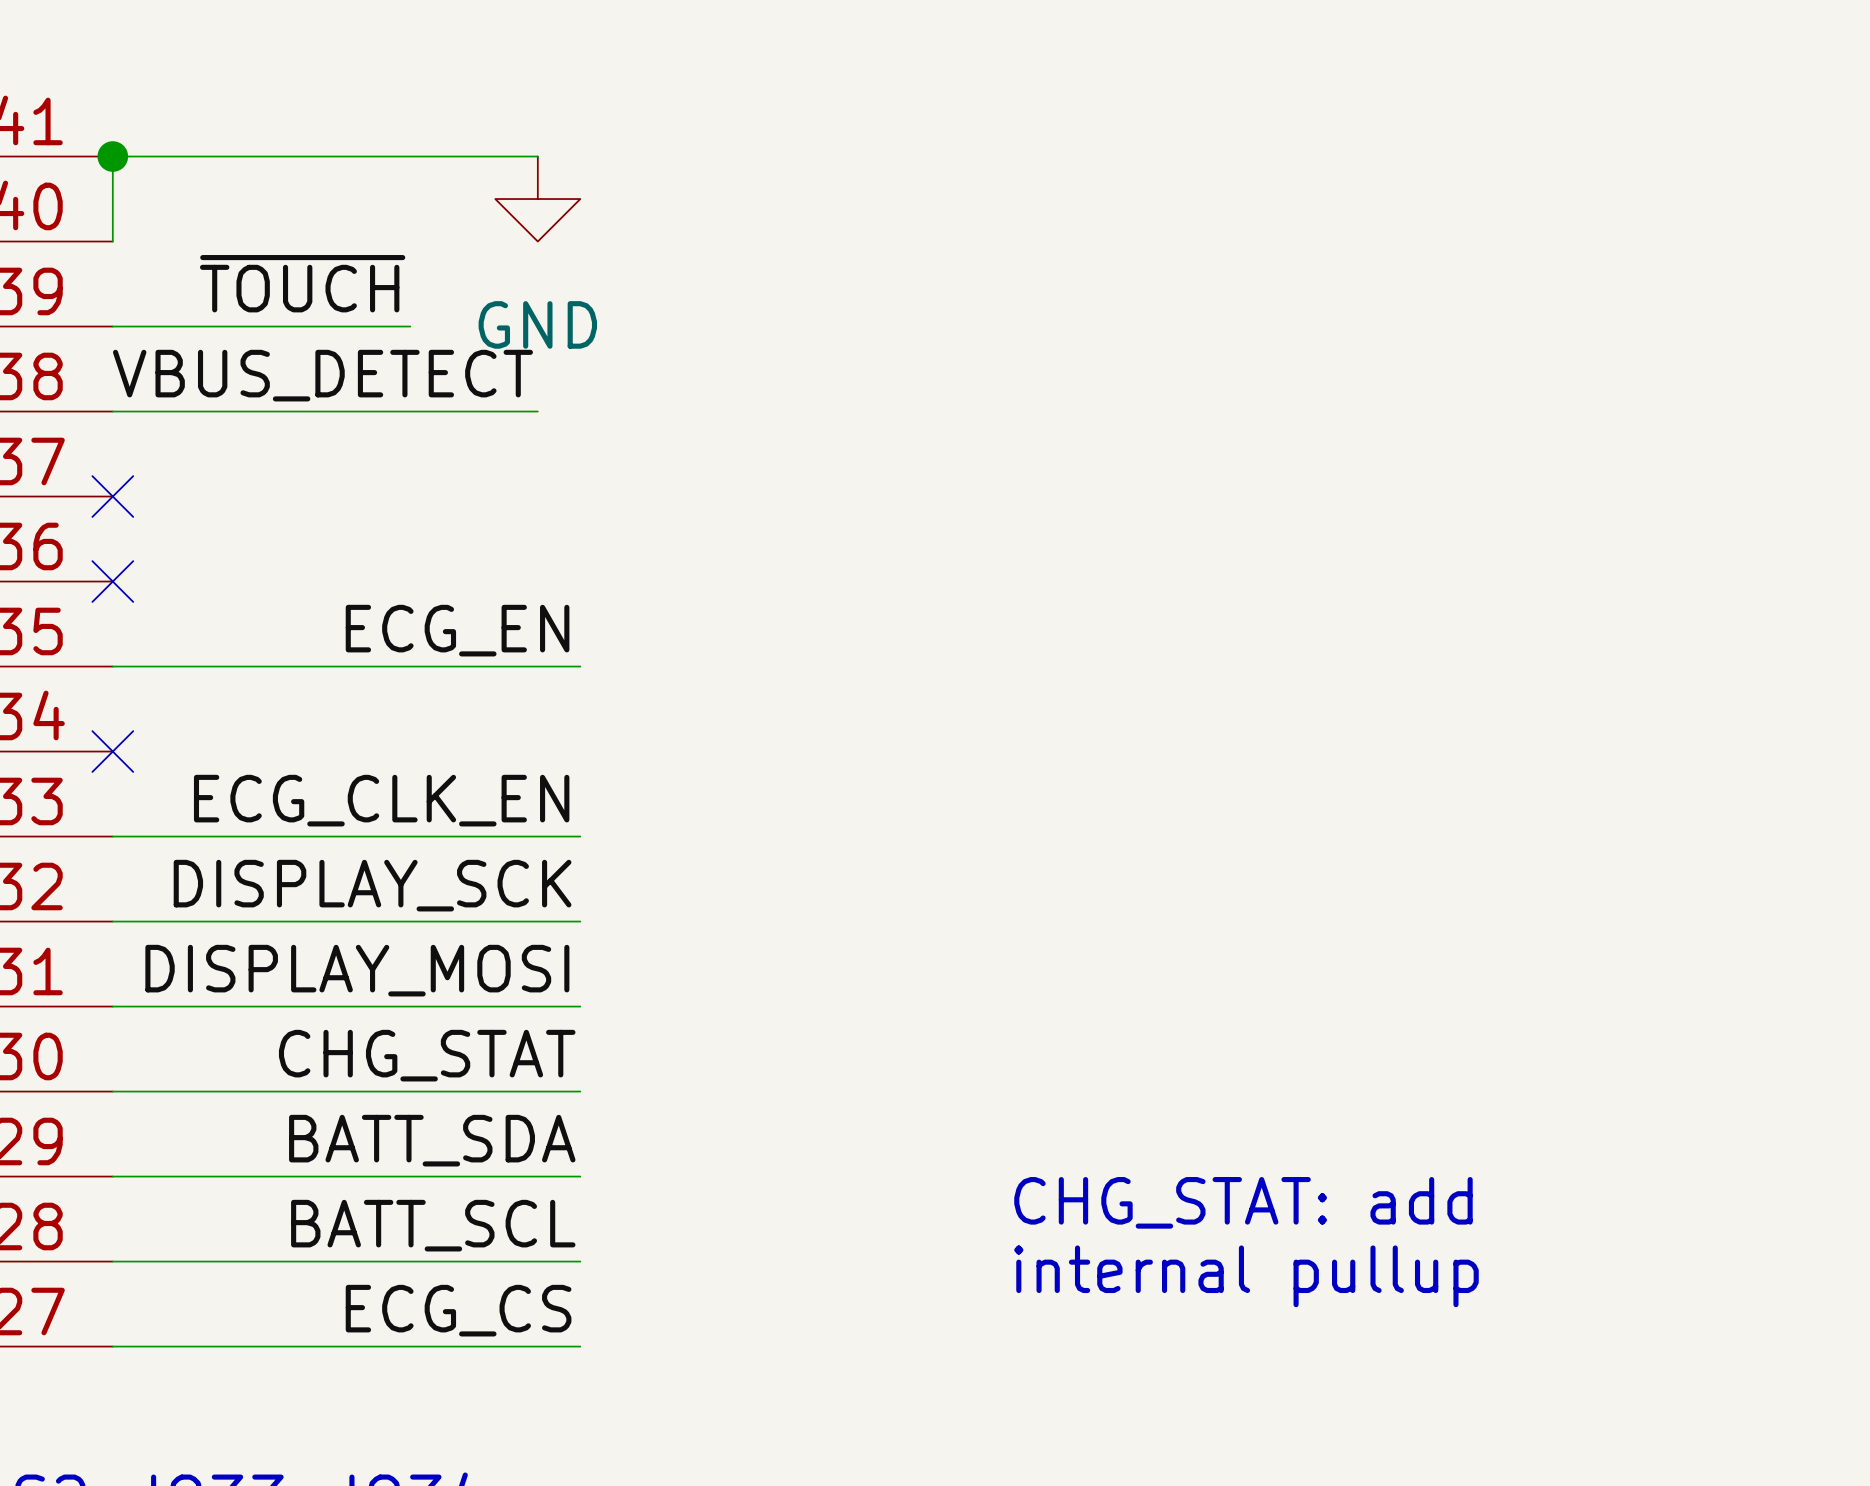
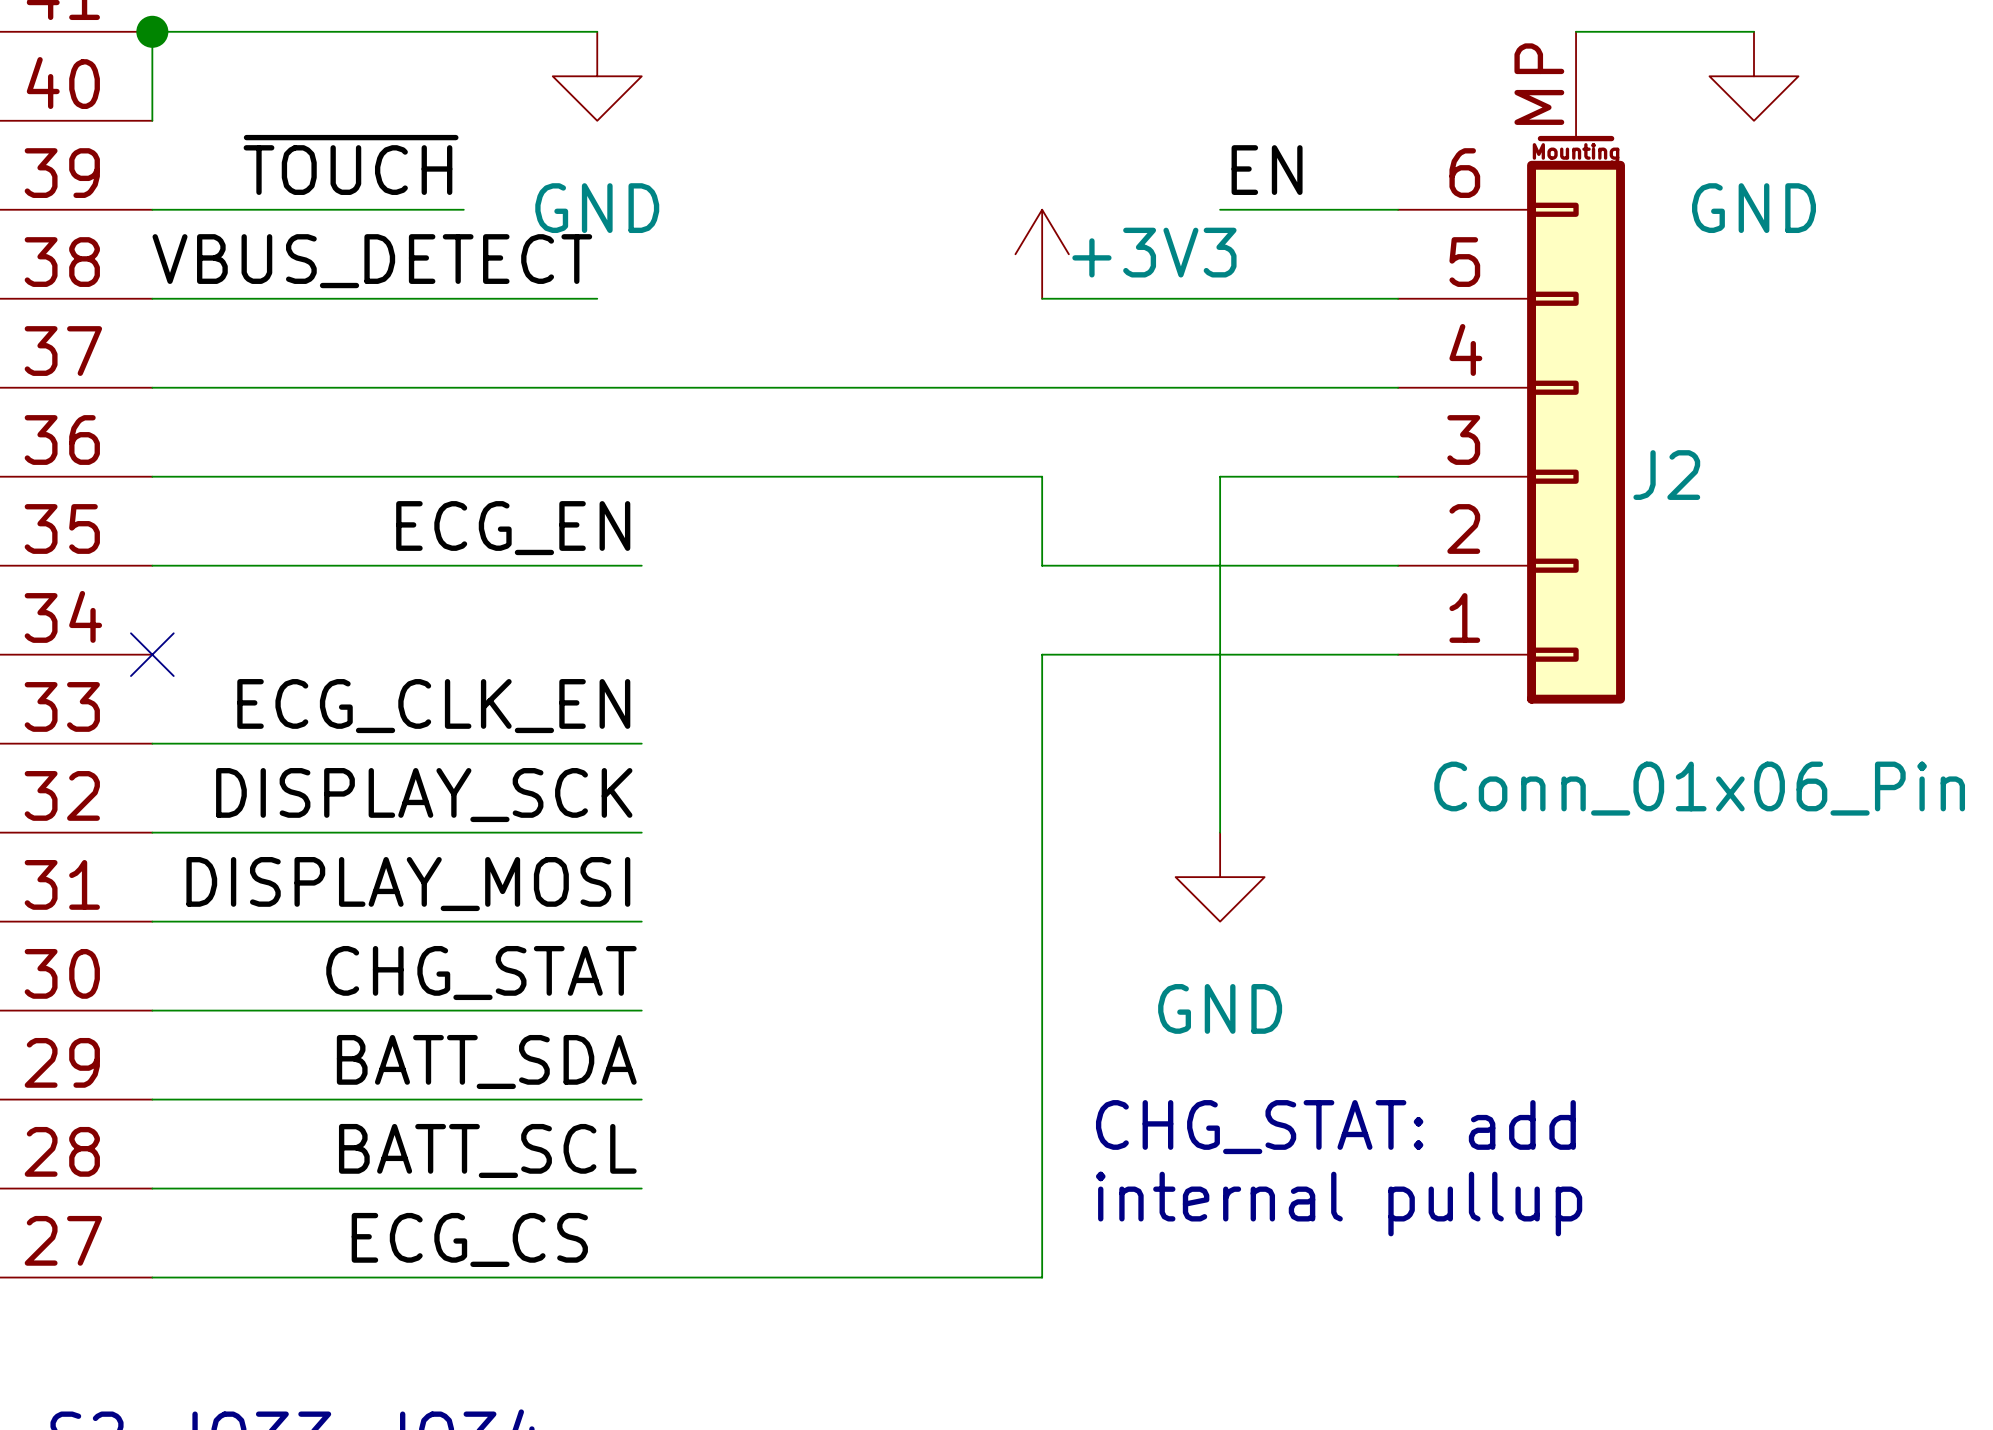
wire: none -> (1576, 31) (1754, 31)
power symbol: none -> GND (1754, 76)
label: none -> EN (1267, 170)
wire: none -> (1220, 209) (1398, 209)
power symbol: none -> +3V3 (1042, 254)
wire: none -> (1042, 298) (1398, 298)
J2: none -> Conn_01x06_Pin (1511, 367)
wire: none -> (152, 387) (1398, 387)
no-connect mark: (112, 496) -> none
wire: none -> (152, 476) (1042, 476) (1042, 565) (1398, 565)
no-connect mark: (112, 581) -> none
wire: none -> (1398, 476) (1220, 476) (1220, 832)
wire: none -> (1398, 654) (1042, 654) (1042, 1277) (641, 1277)
power symbol: none -> GND (1220, 877)
label position: ECG_CS (458, 1310) -> ECG_CS (469, 1239)

